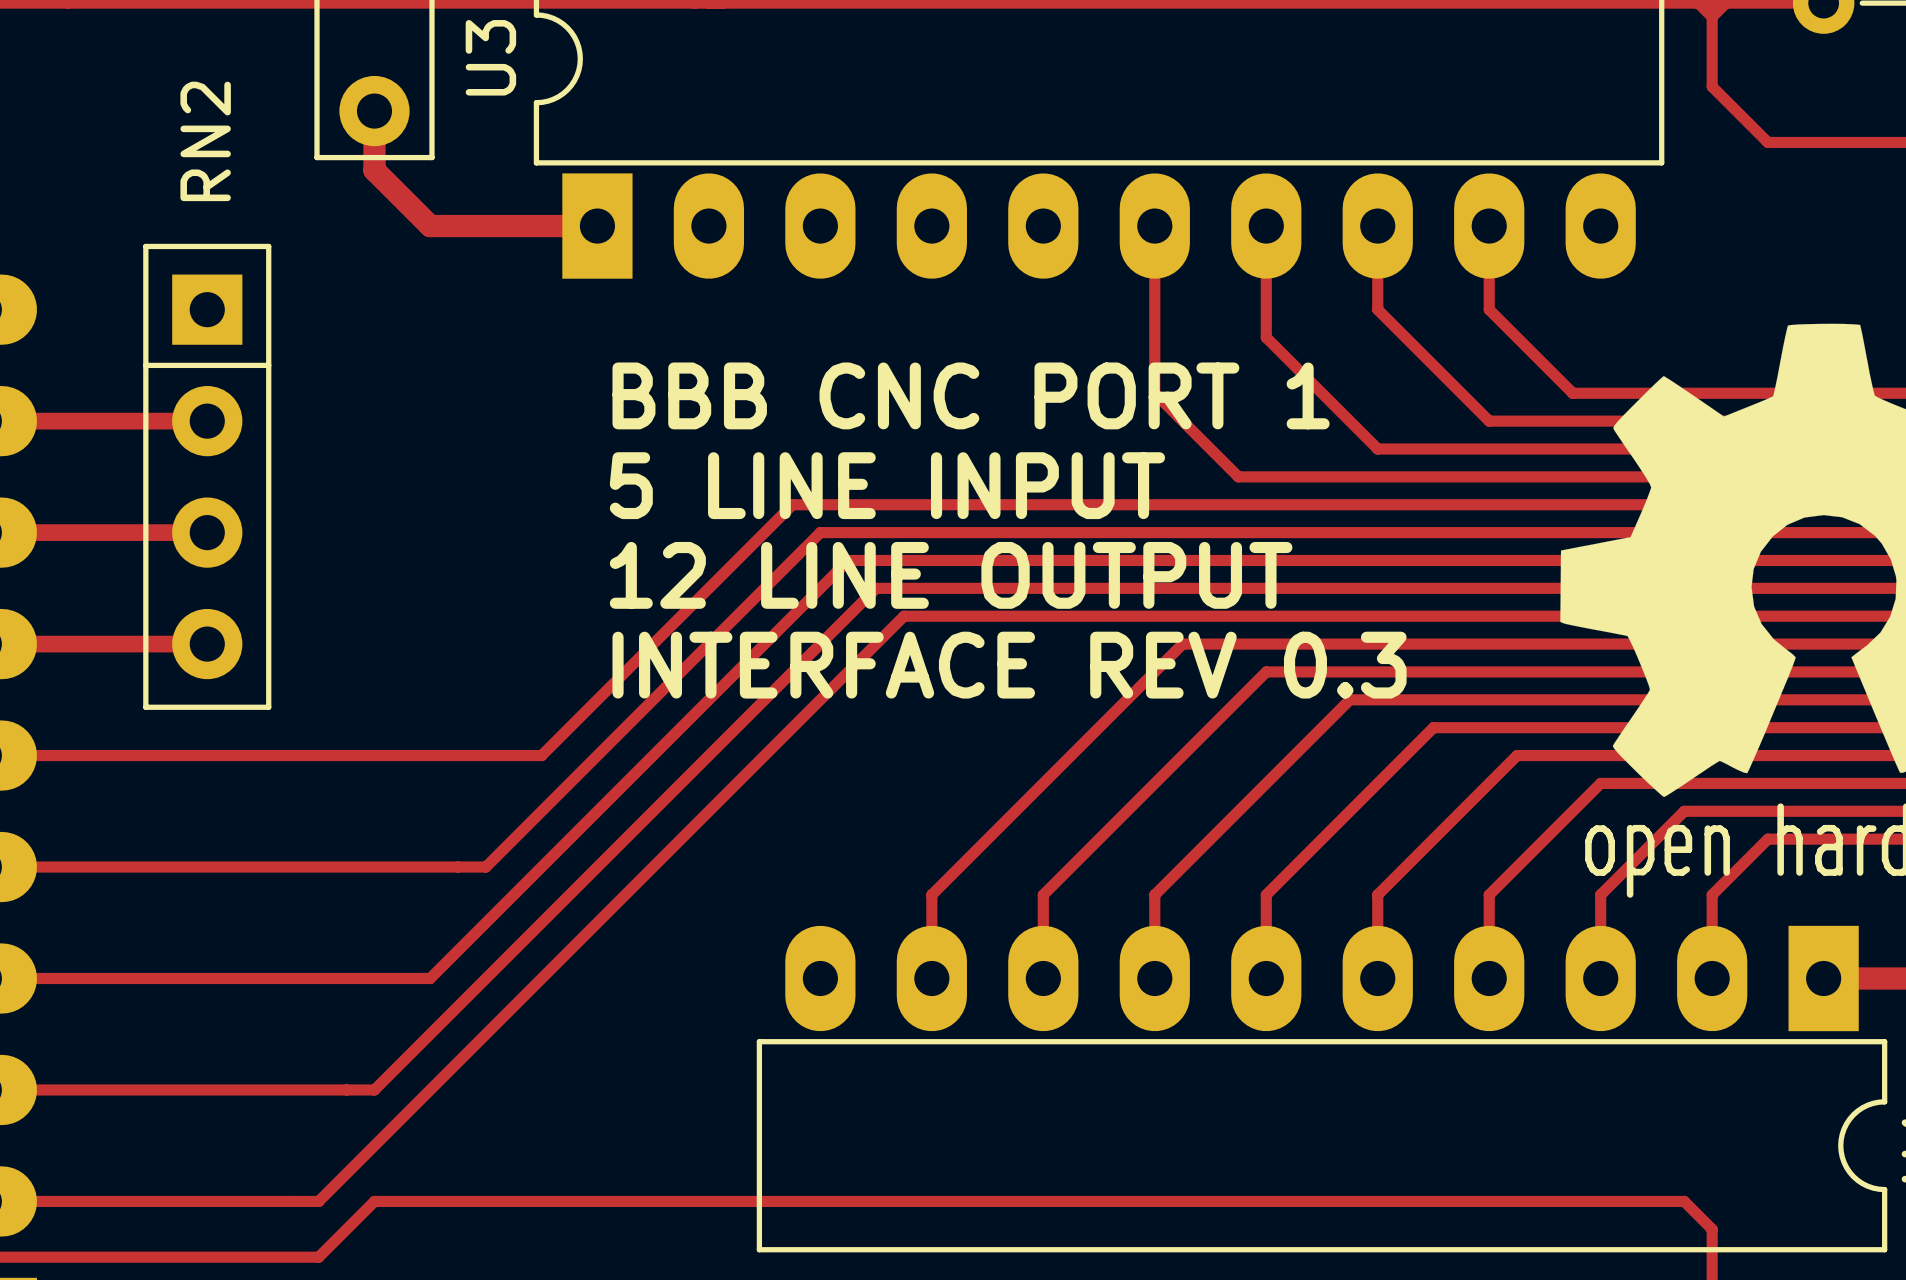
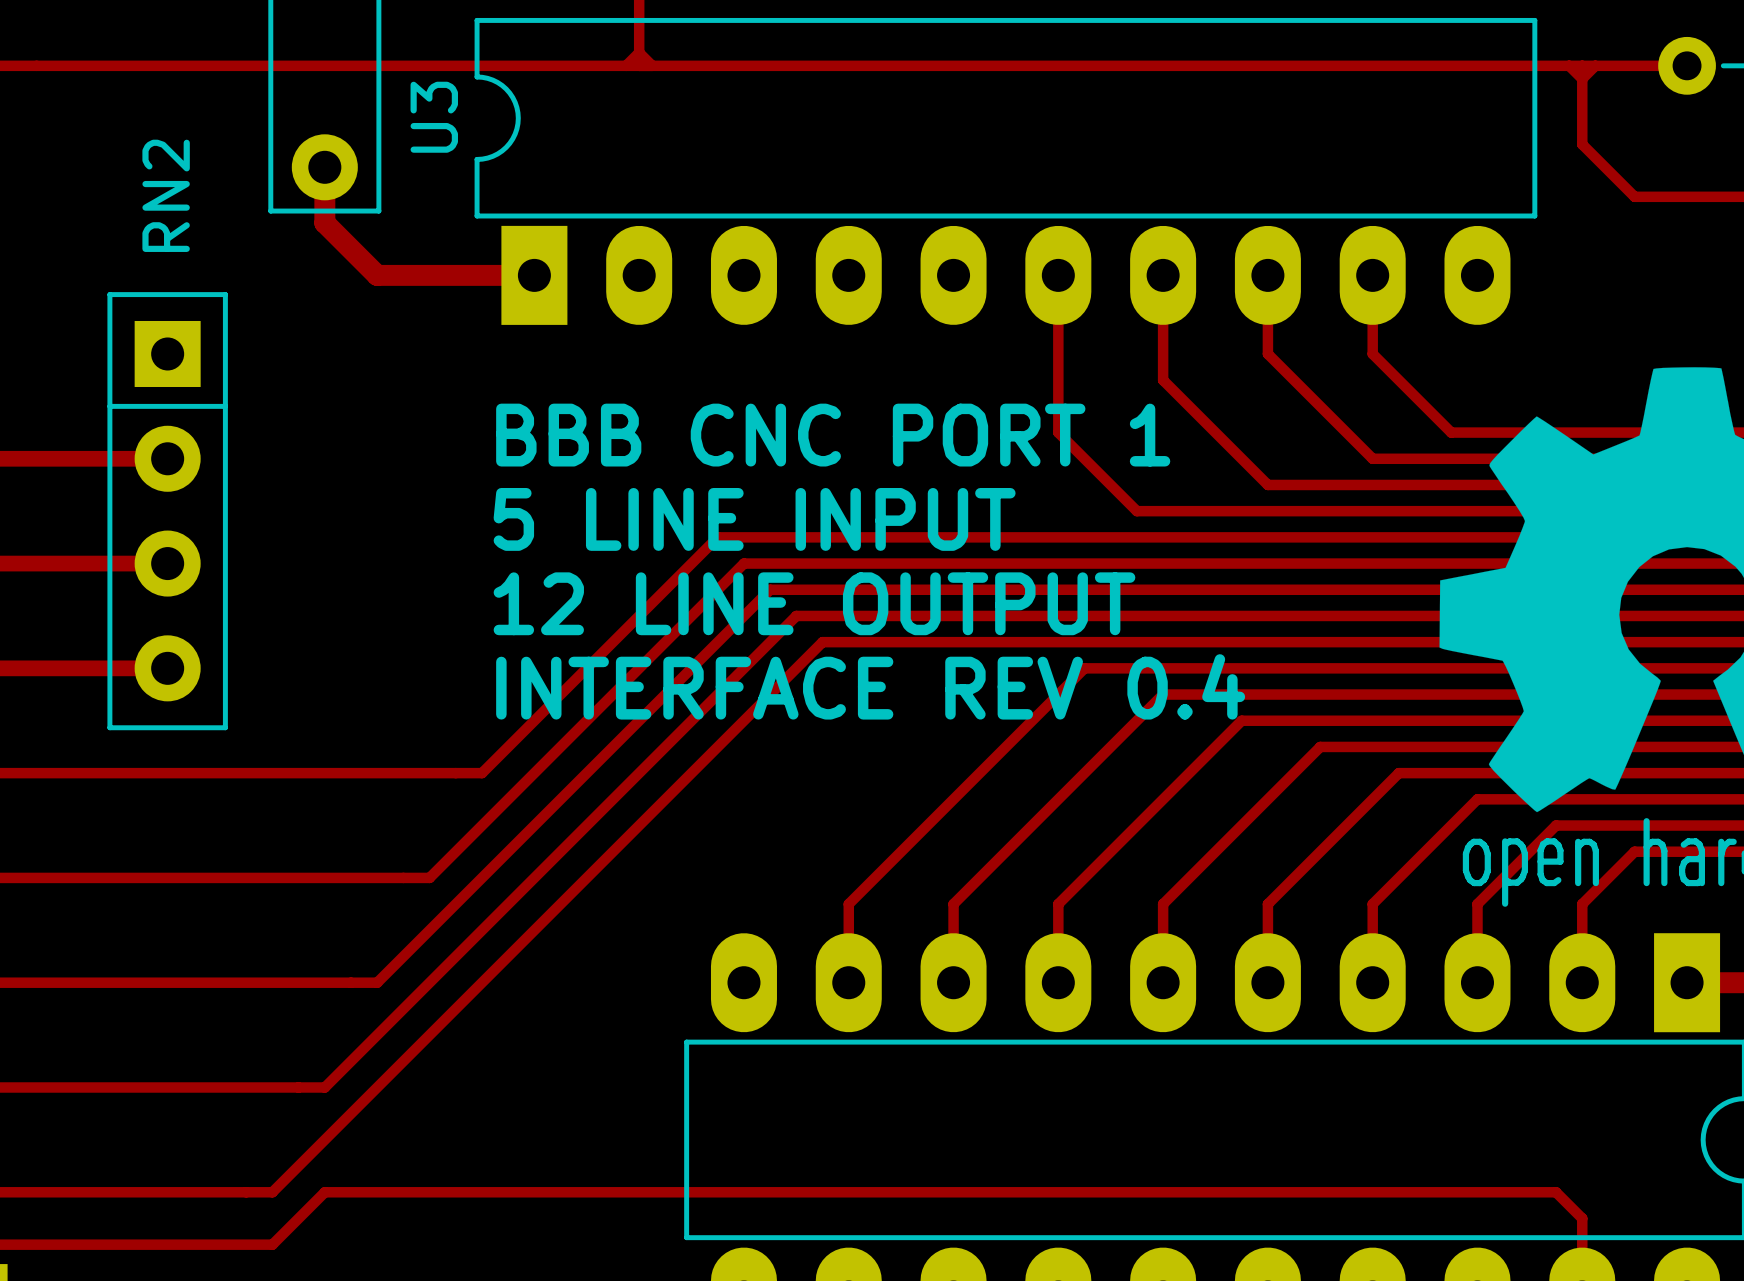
text position: BBB CNC PORT 1 (971, 395) -> BBB CNC PORT 1 (833, 435)
text position: 5 LINE INPUT (887, 485) -> 5 LINE INPUT (754, 519)
text position: 12 LINE OUTPUT (951, 575) -> 12 LINE OUTPUT (814, 603)
text: INTERFACE REV 0.3 (1009, 665) -> INTERFACE REV 0.4 (870, 686)

